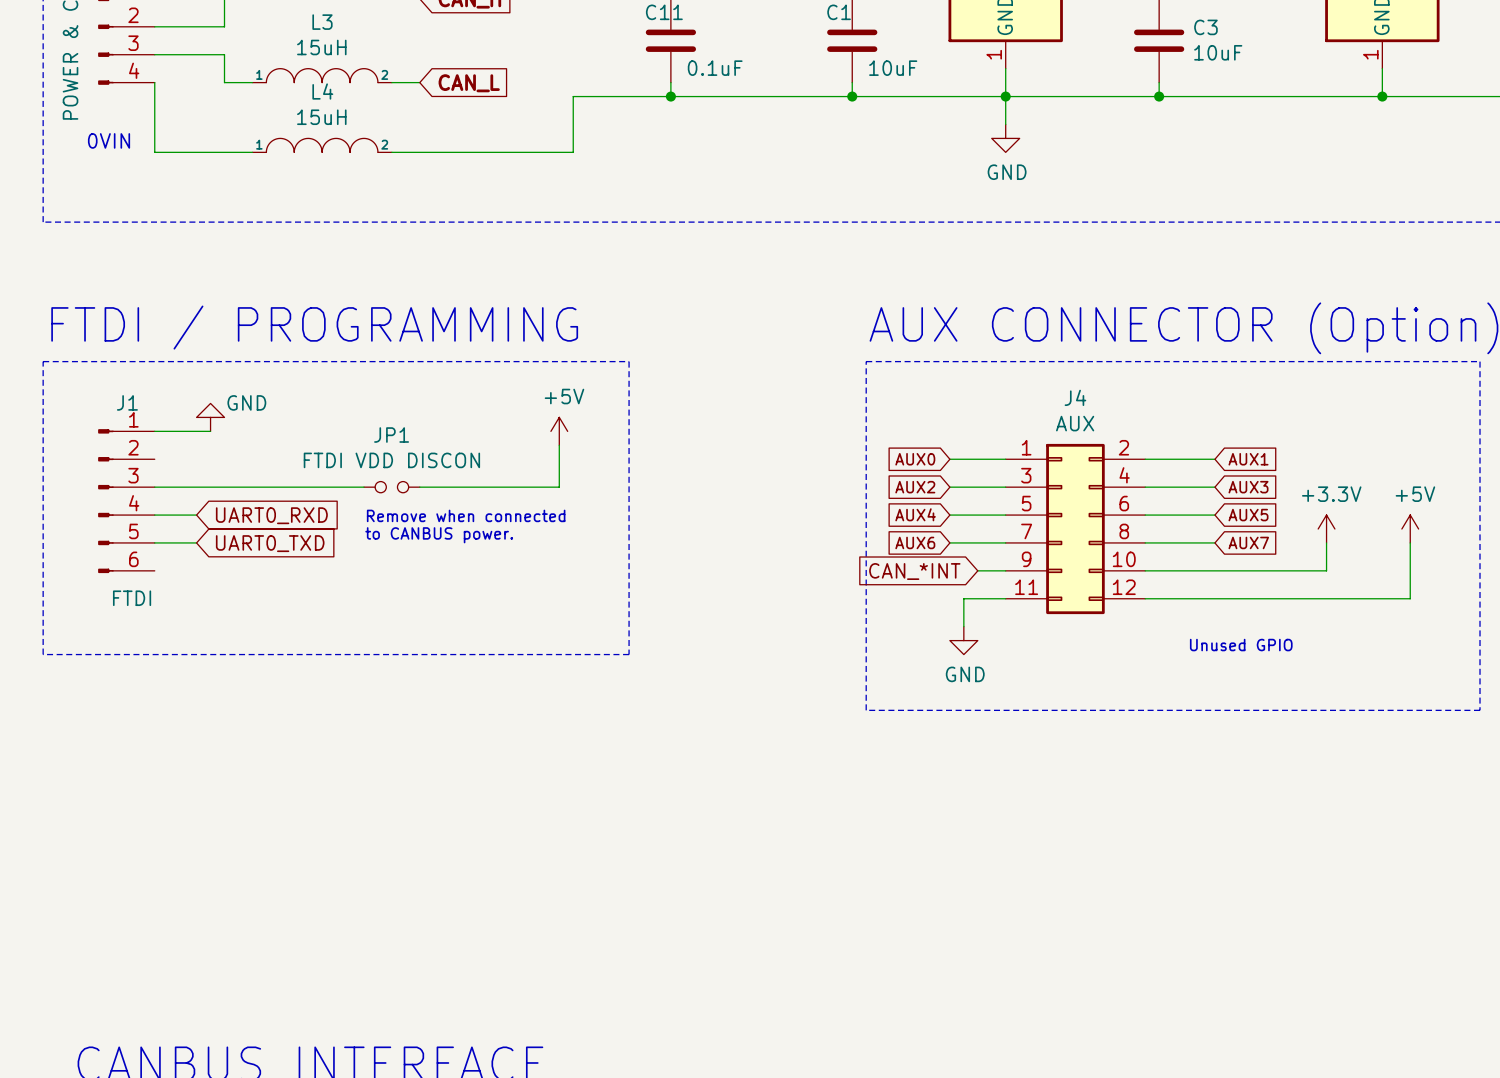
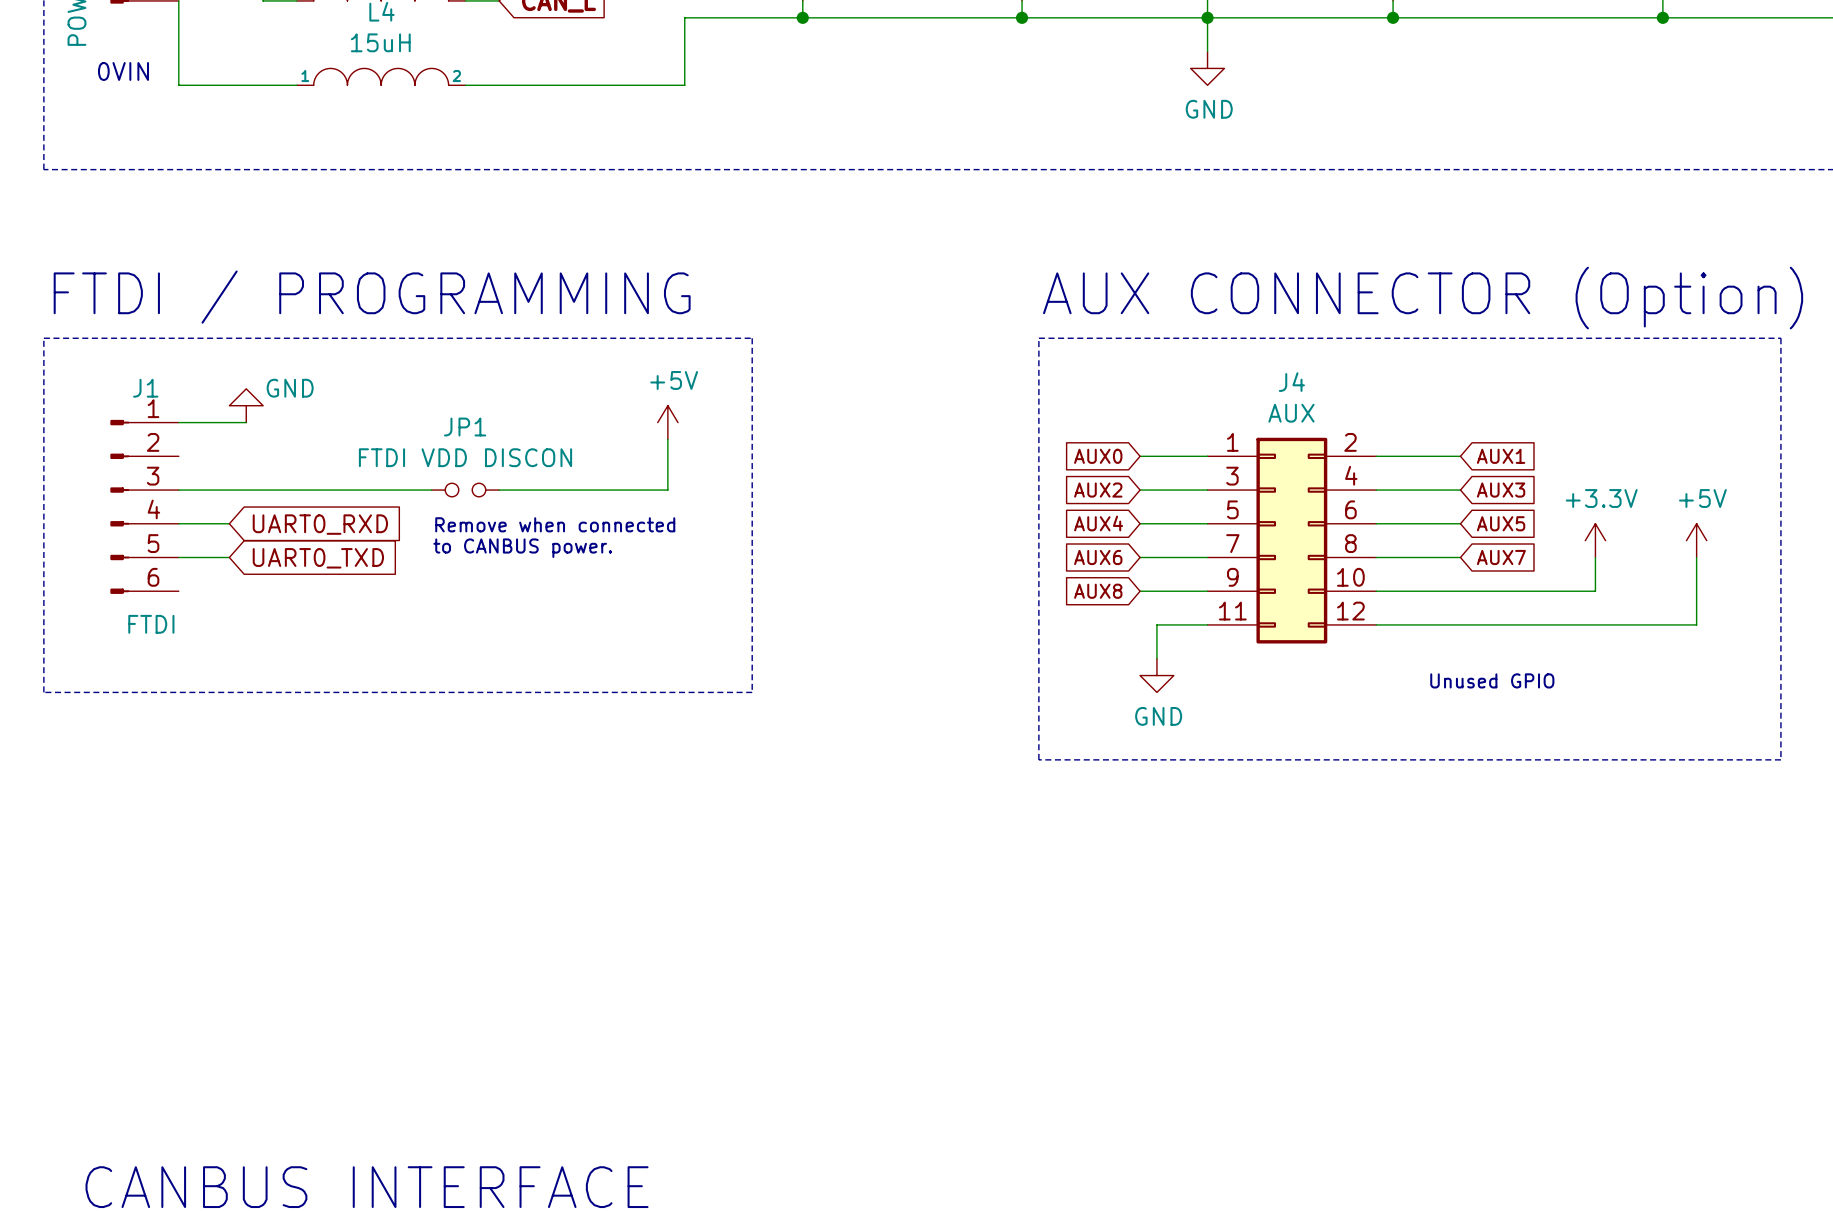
global label: none -> AUX8 (1098, 591)
wire: none -> (1140, 591) (1173, 591)
global label: CAN_*INT (914, 571) -> none

